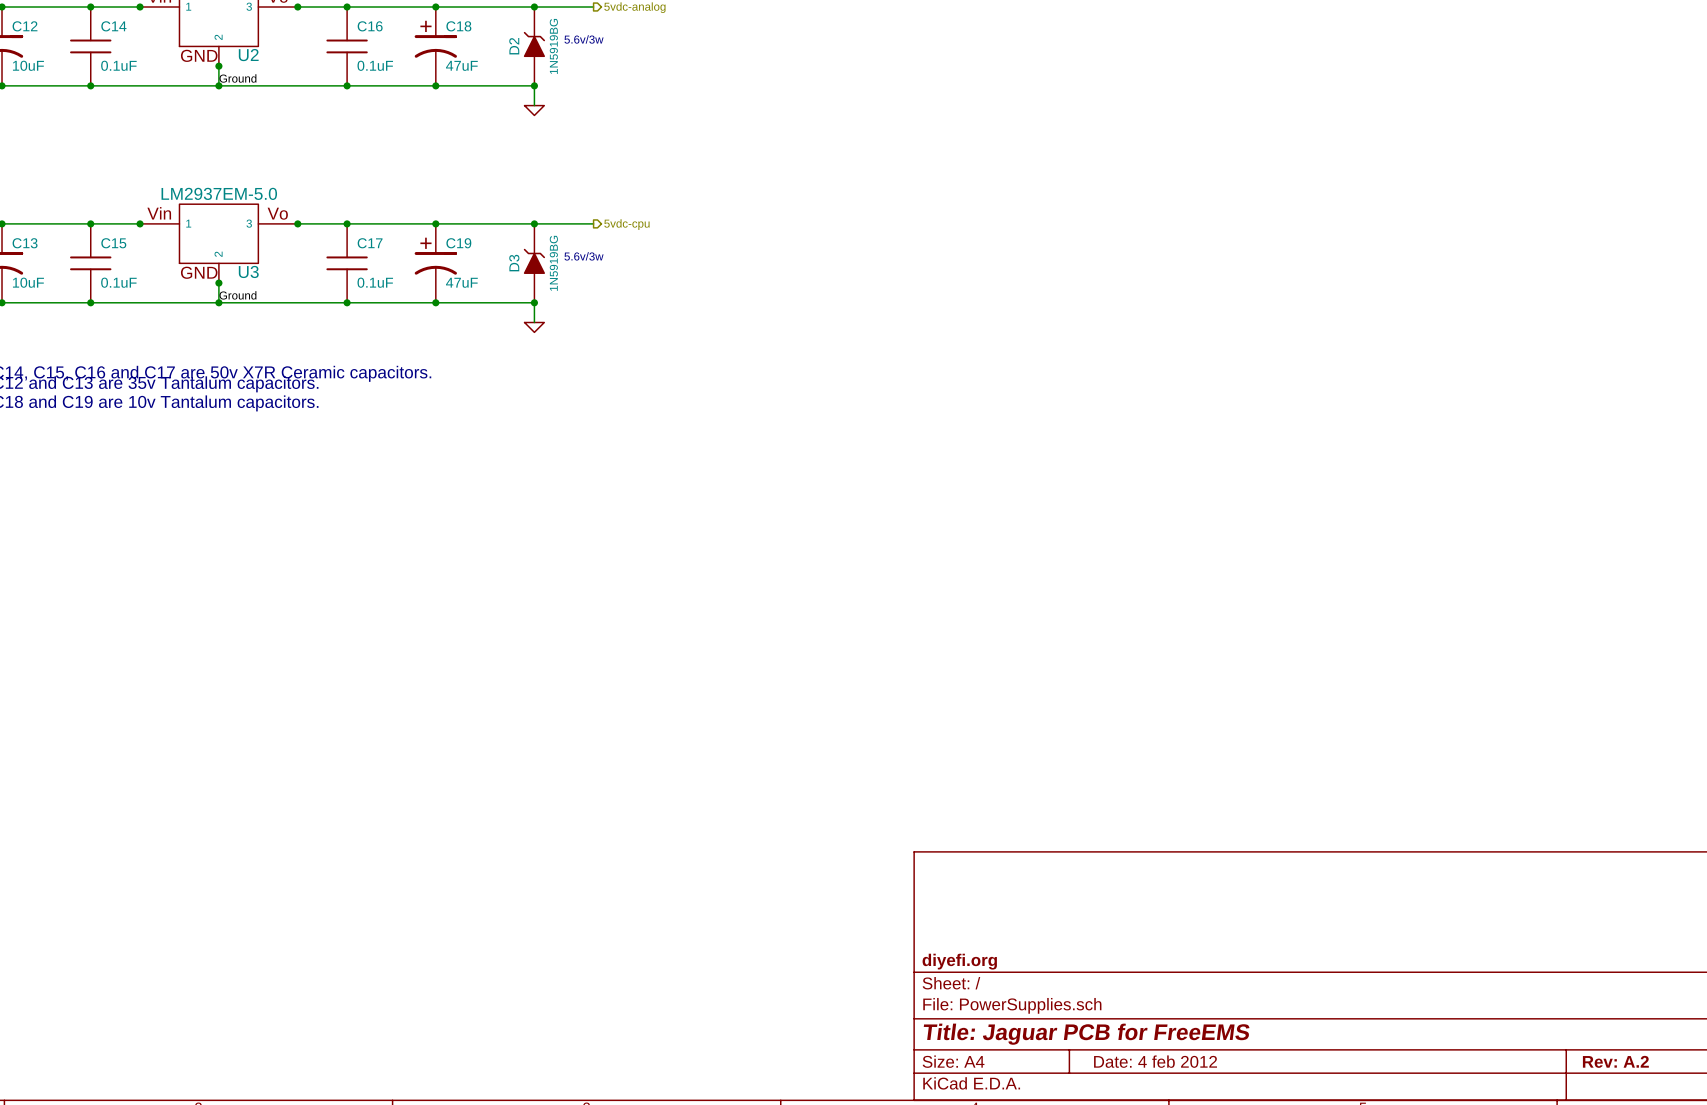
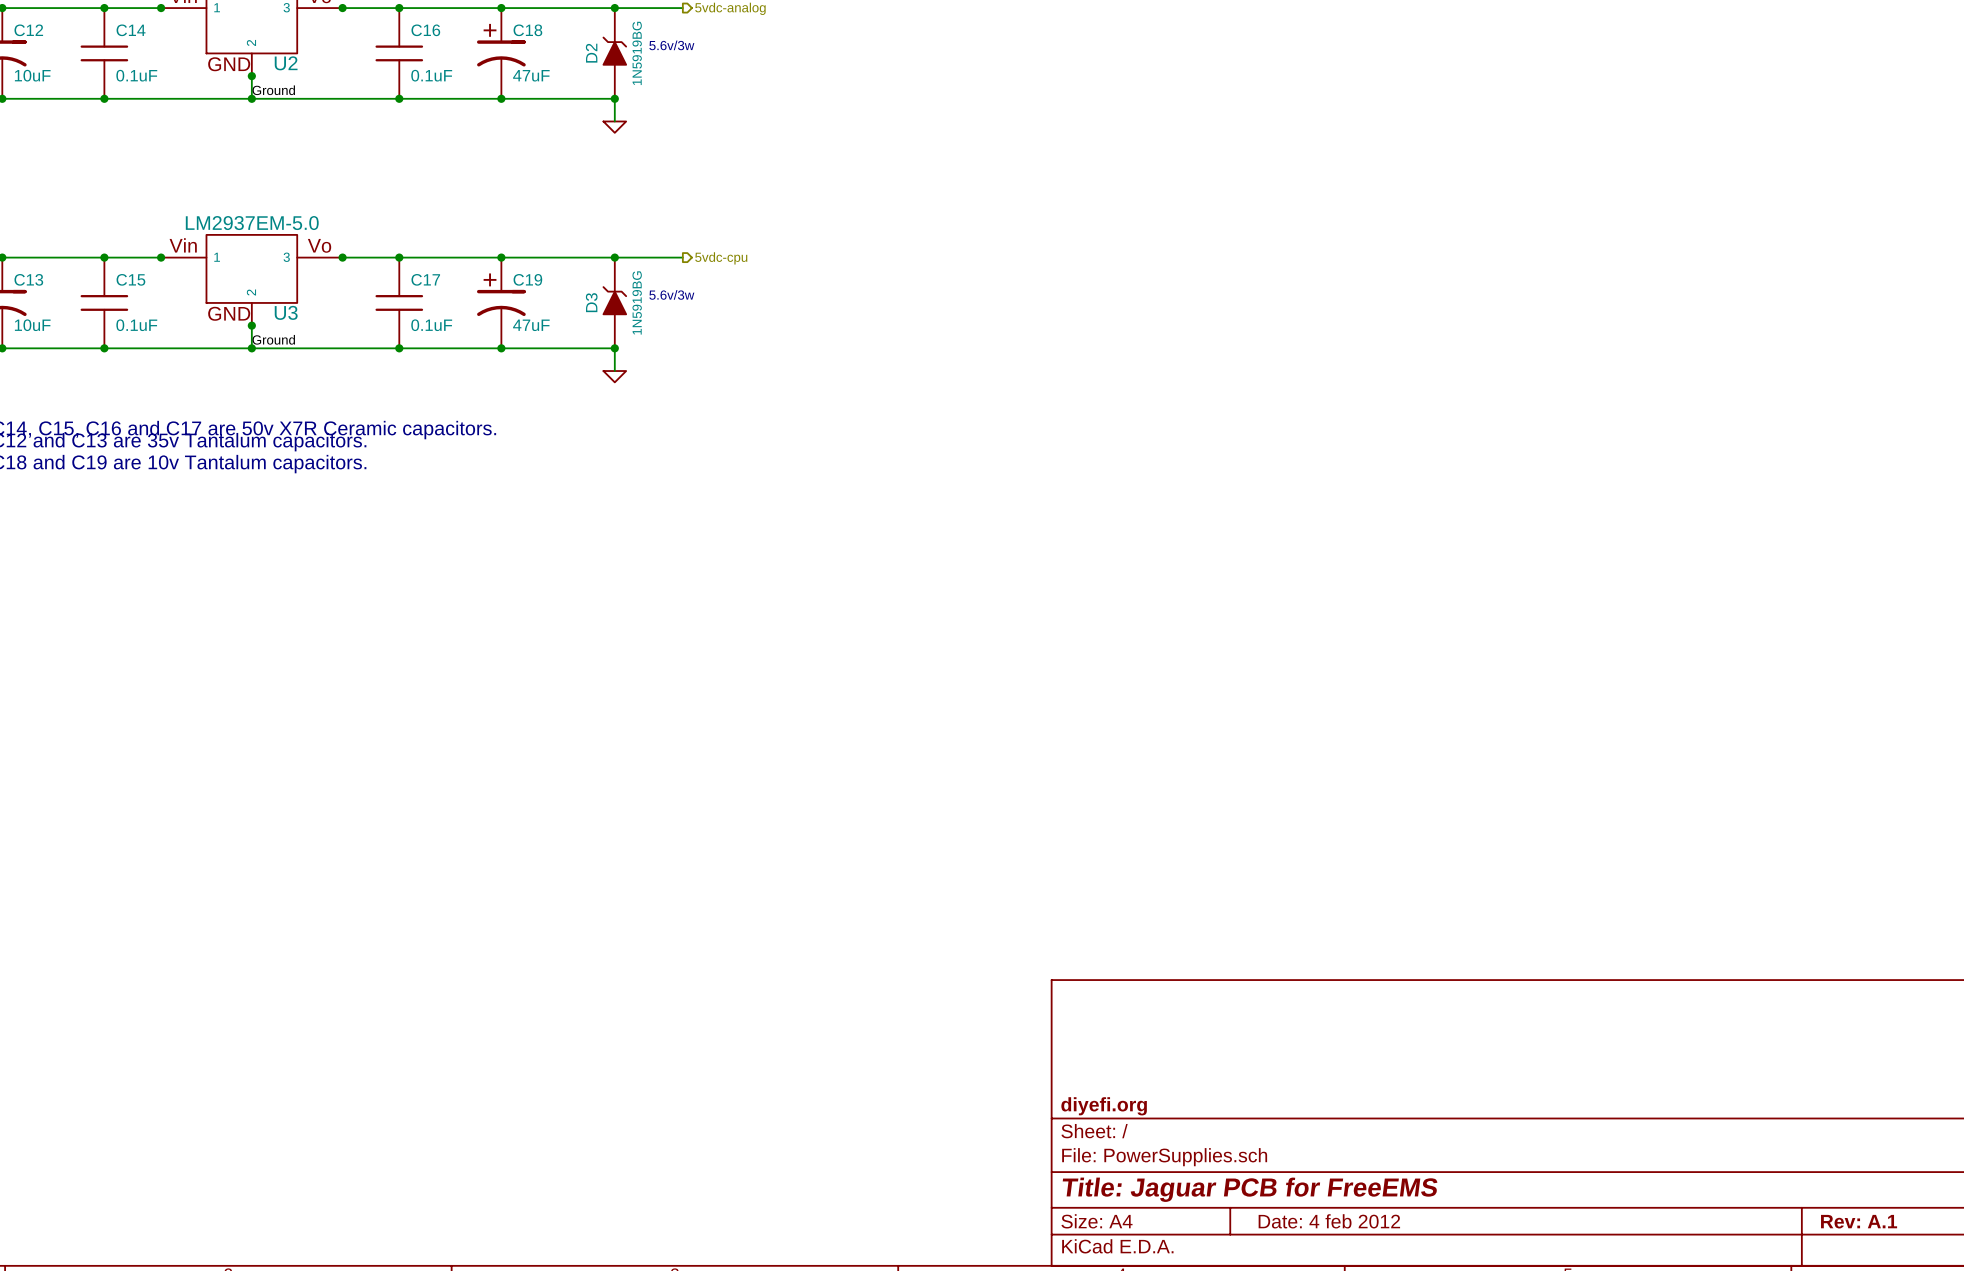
title block: Rev: A.2 (1615, 1061) -> Rev: A.1 (1859, 1221)

